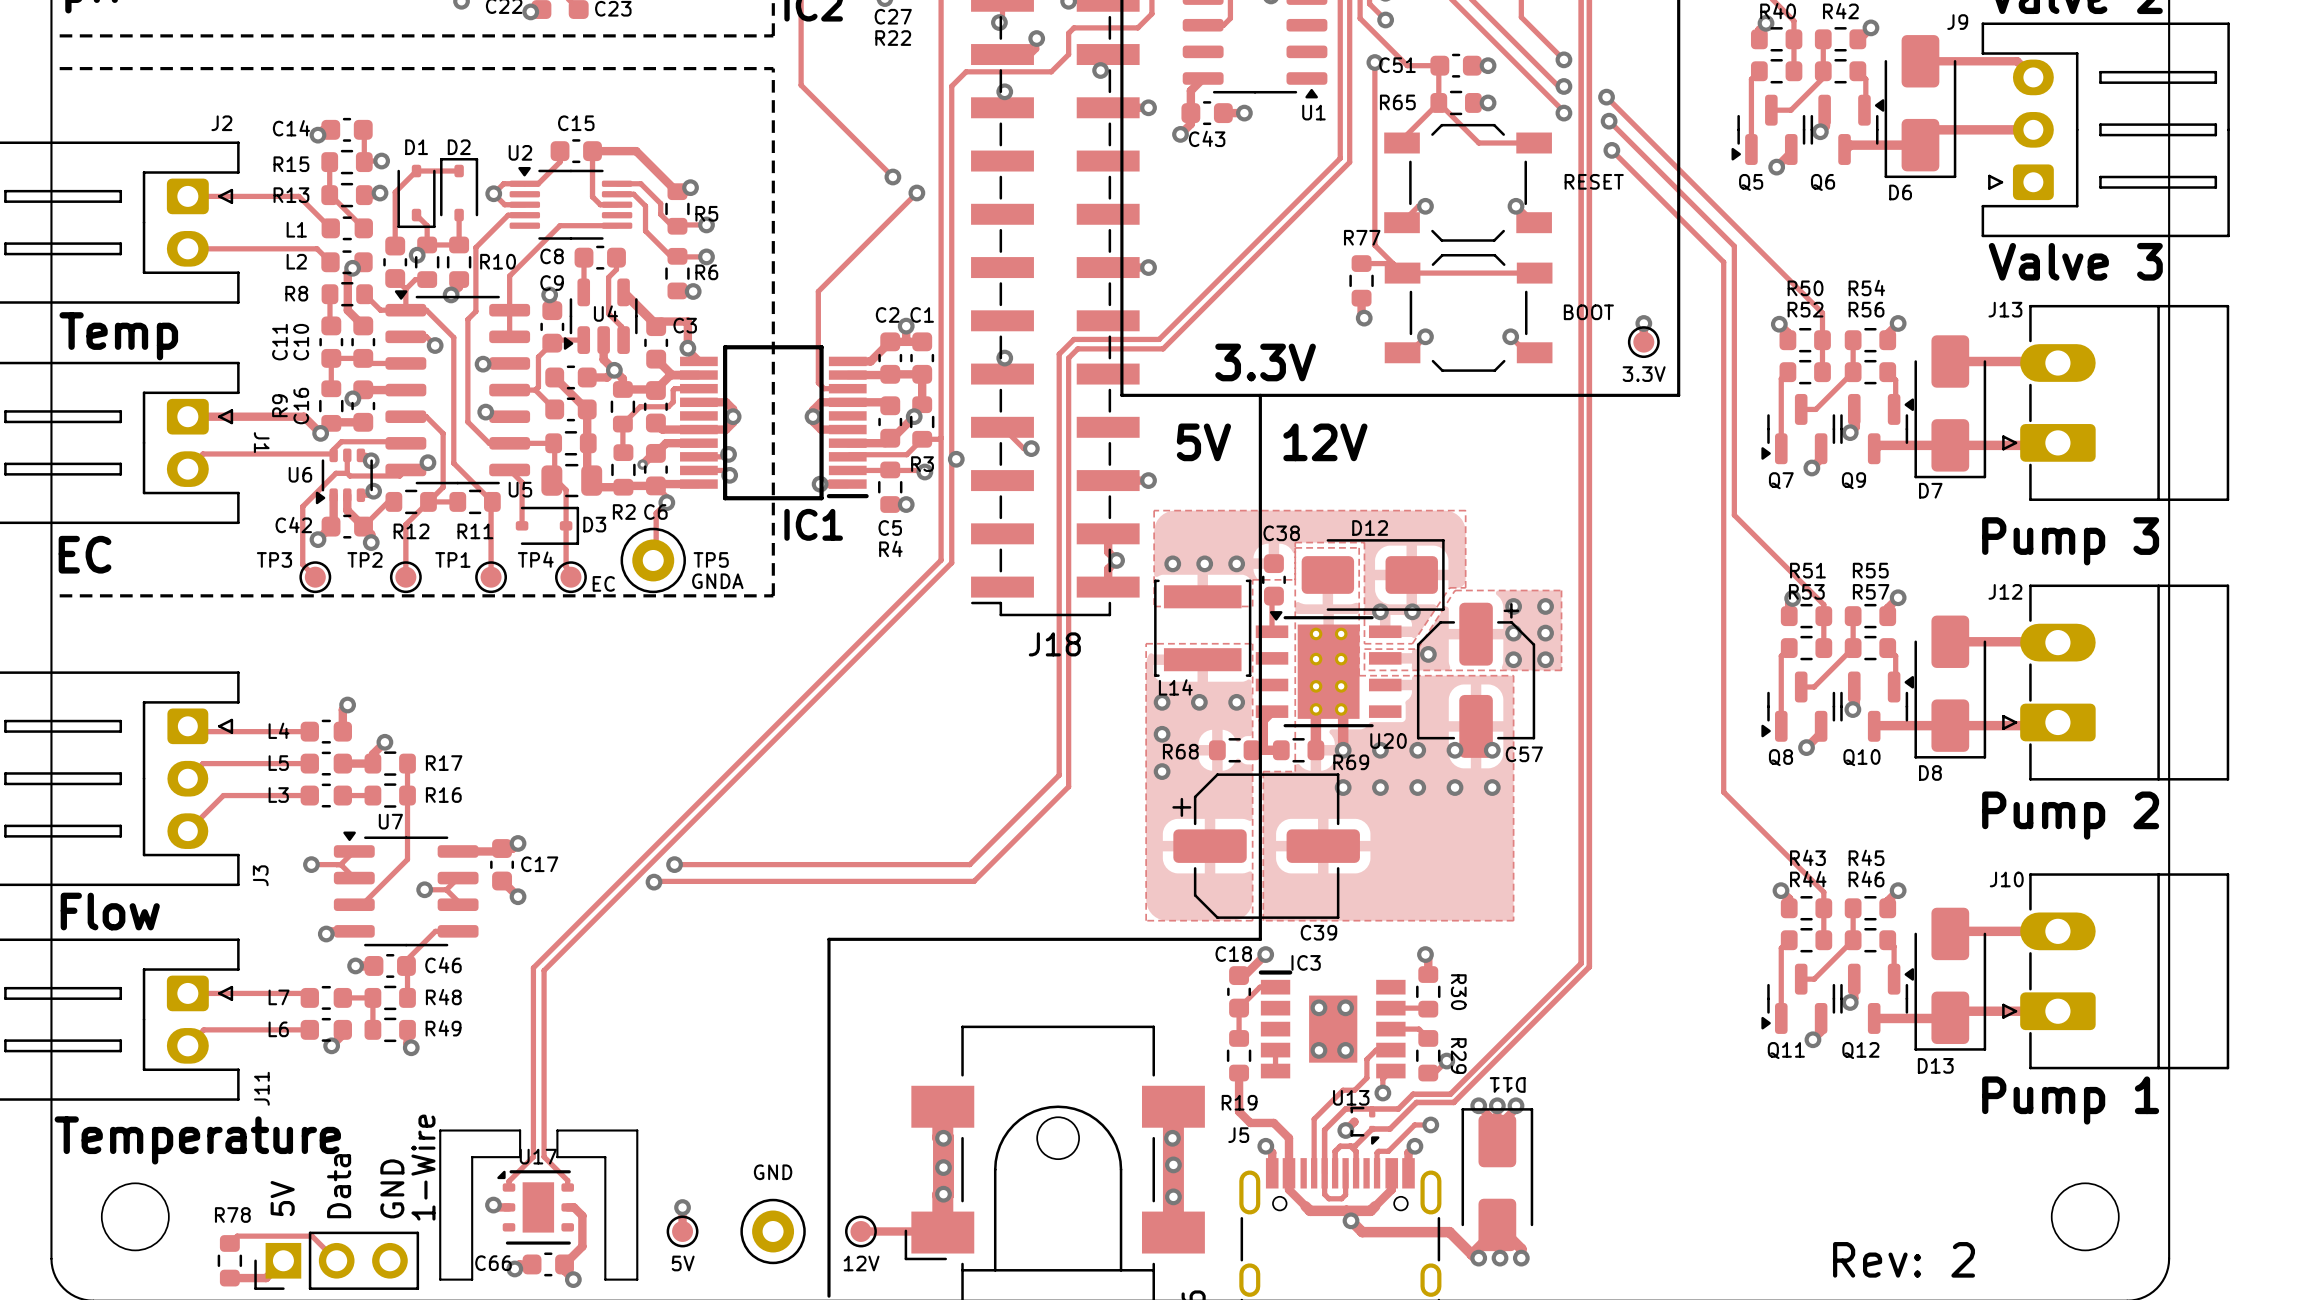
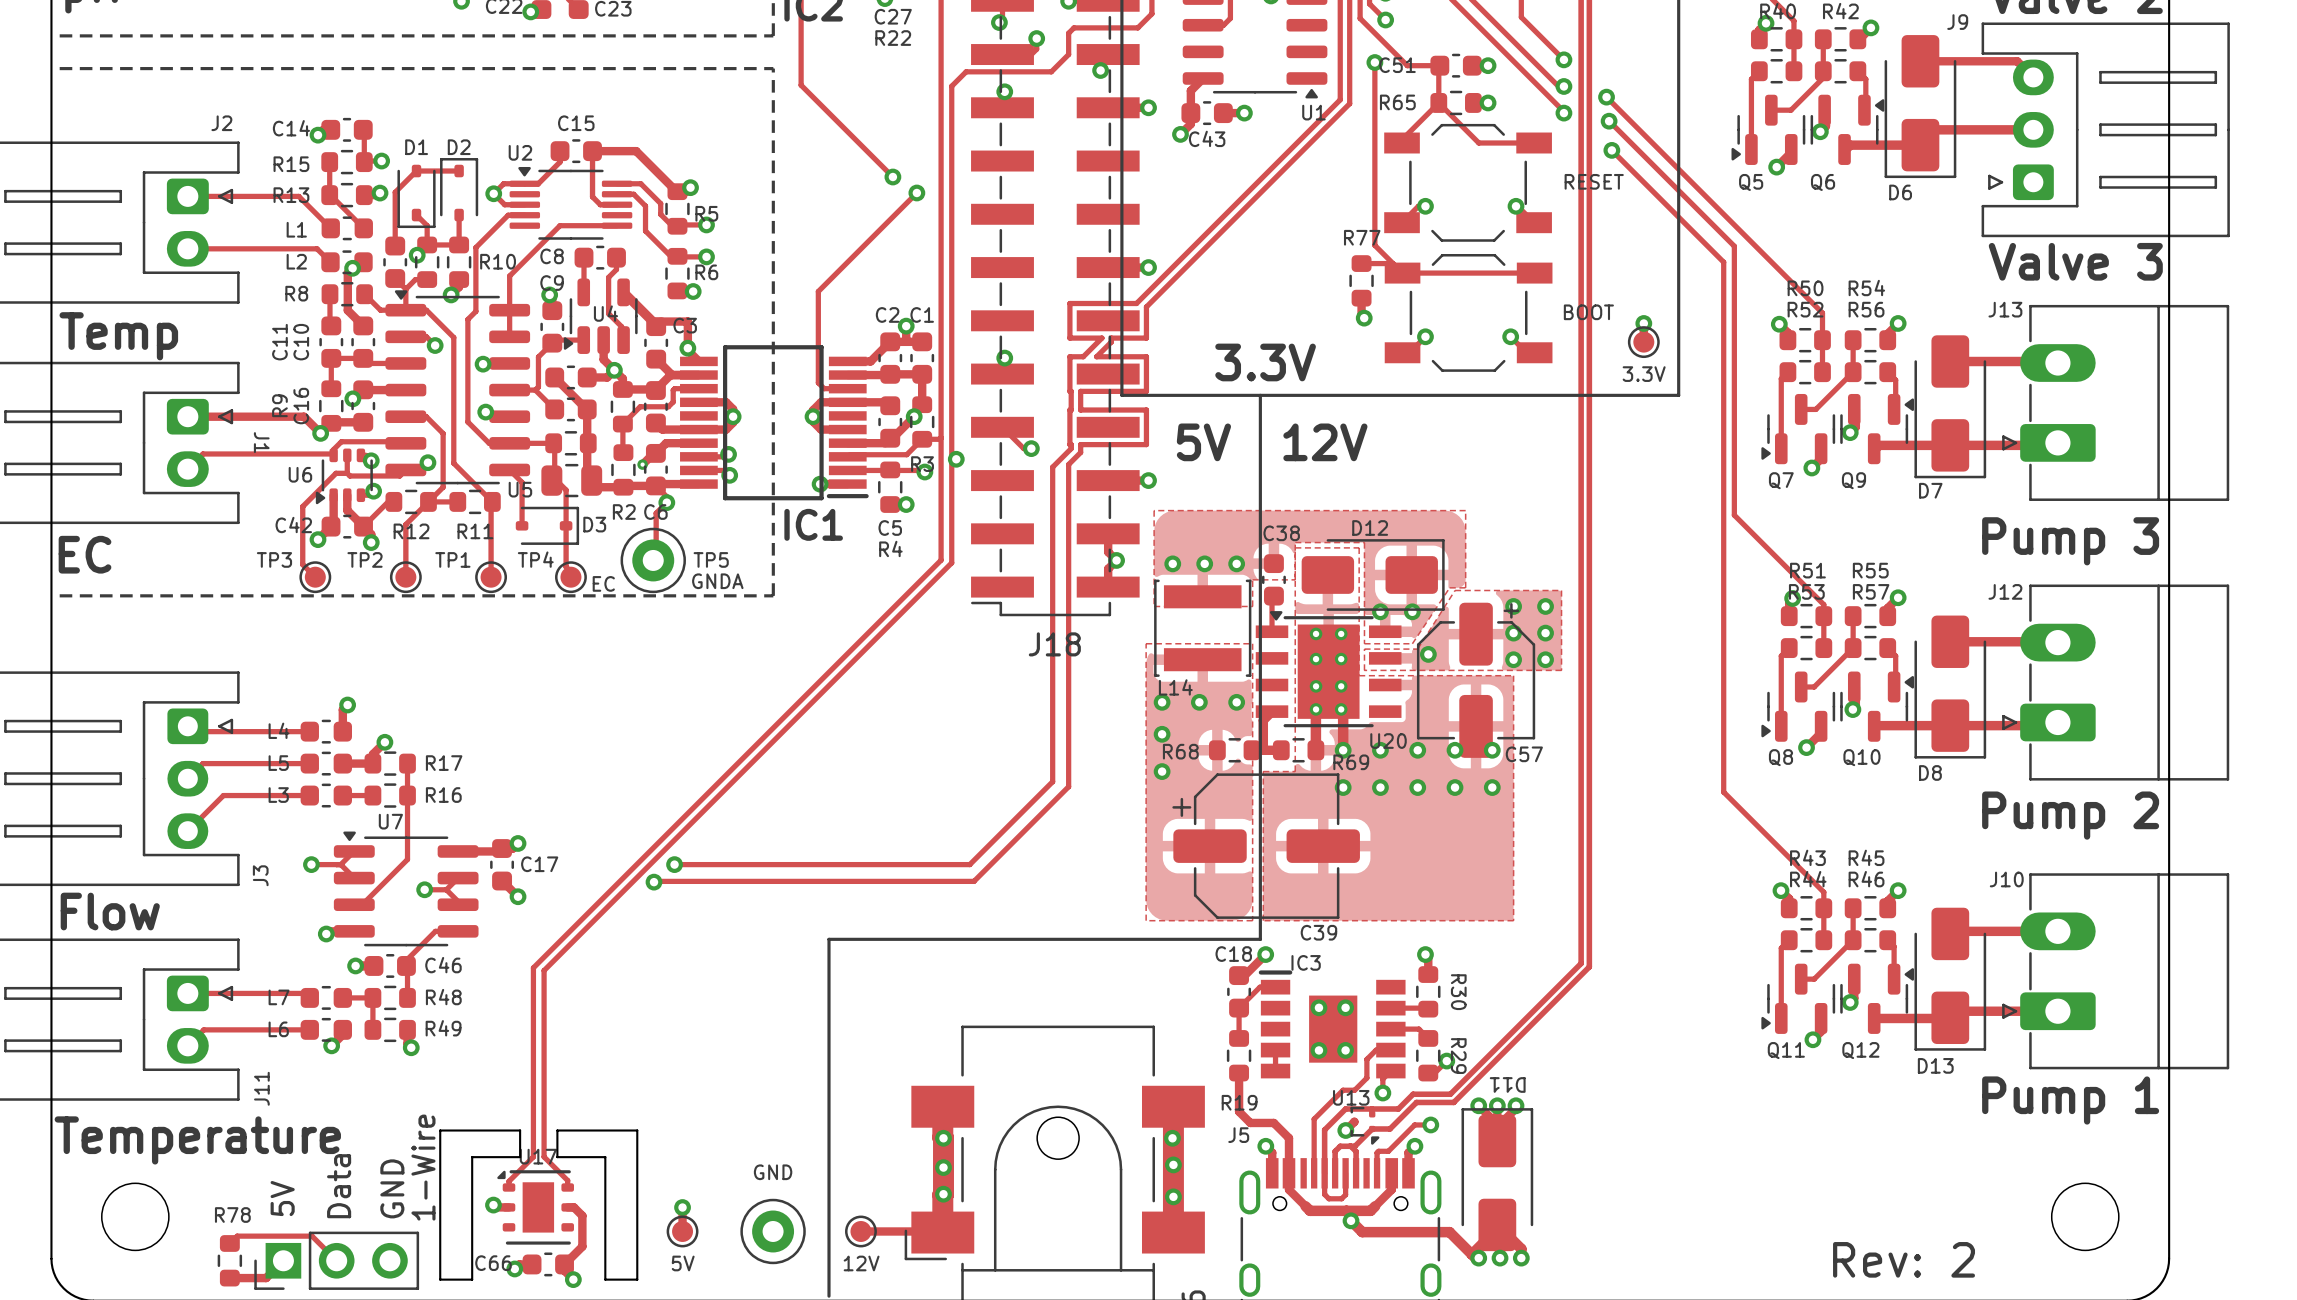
track: (1340, 99) (1340, 158) (1159, 339) (1073, 339) (1059, 354) (1059, 775) (1052, 781) -> (1340, 99) (1136, 303) (1069, 303) (1069, 338) (1101, 338) (1083, 356) (1069, 356) (1071, 448) (1052, 467) (1052, 781)
track: (1349, 103) (1349, 162) (1163, 348) (1077, 348) (1068, 358) (1068, 464) -> (1349, 103) (1146, 306) (1146, 338) (1111, 338) (1111, 342) (1096, 356) (1146, 356) (1146, 391) (1080, 391) (1080, 410) (1146, 410) (1146, 444) (1080, 444) (1080, 452) (1068, 464)

